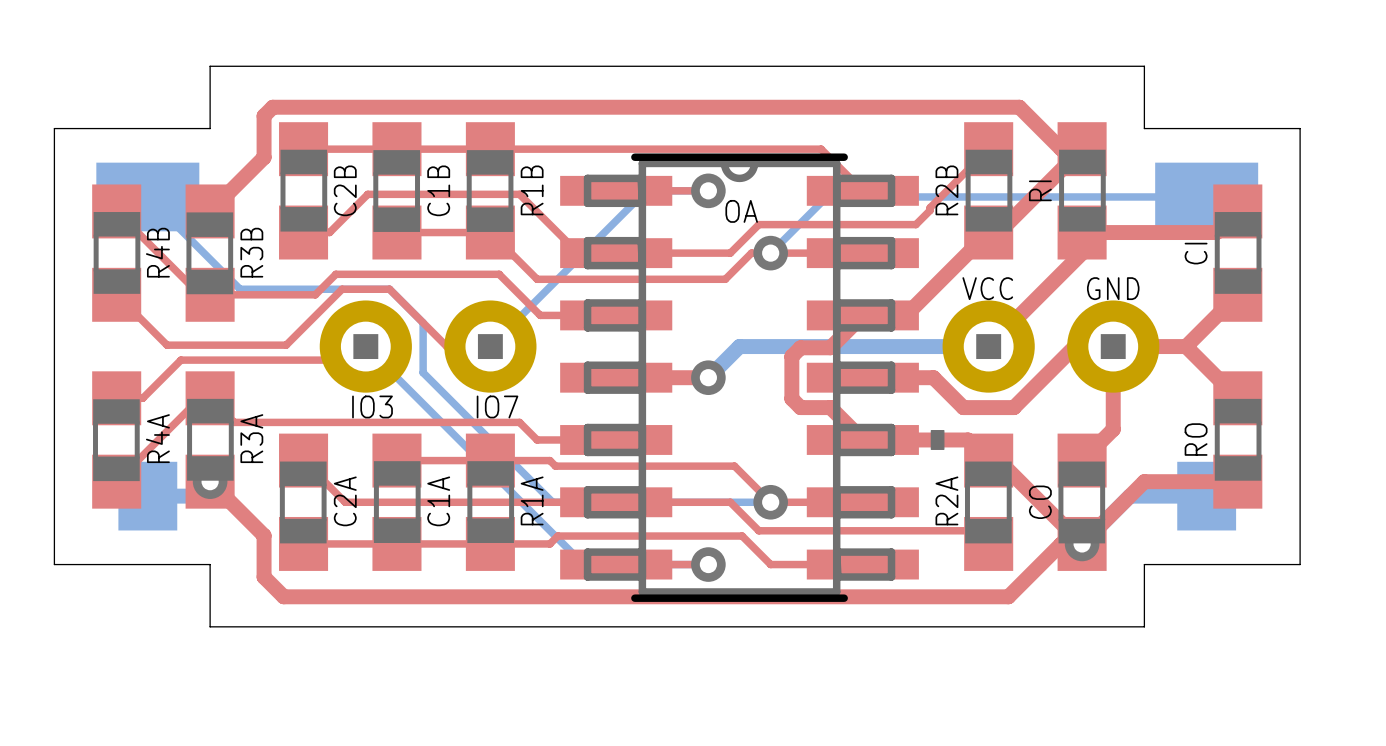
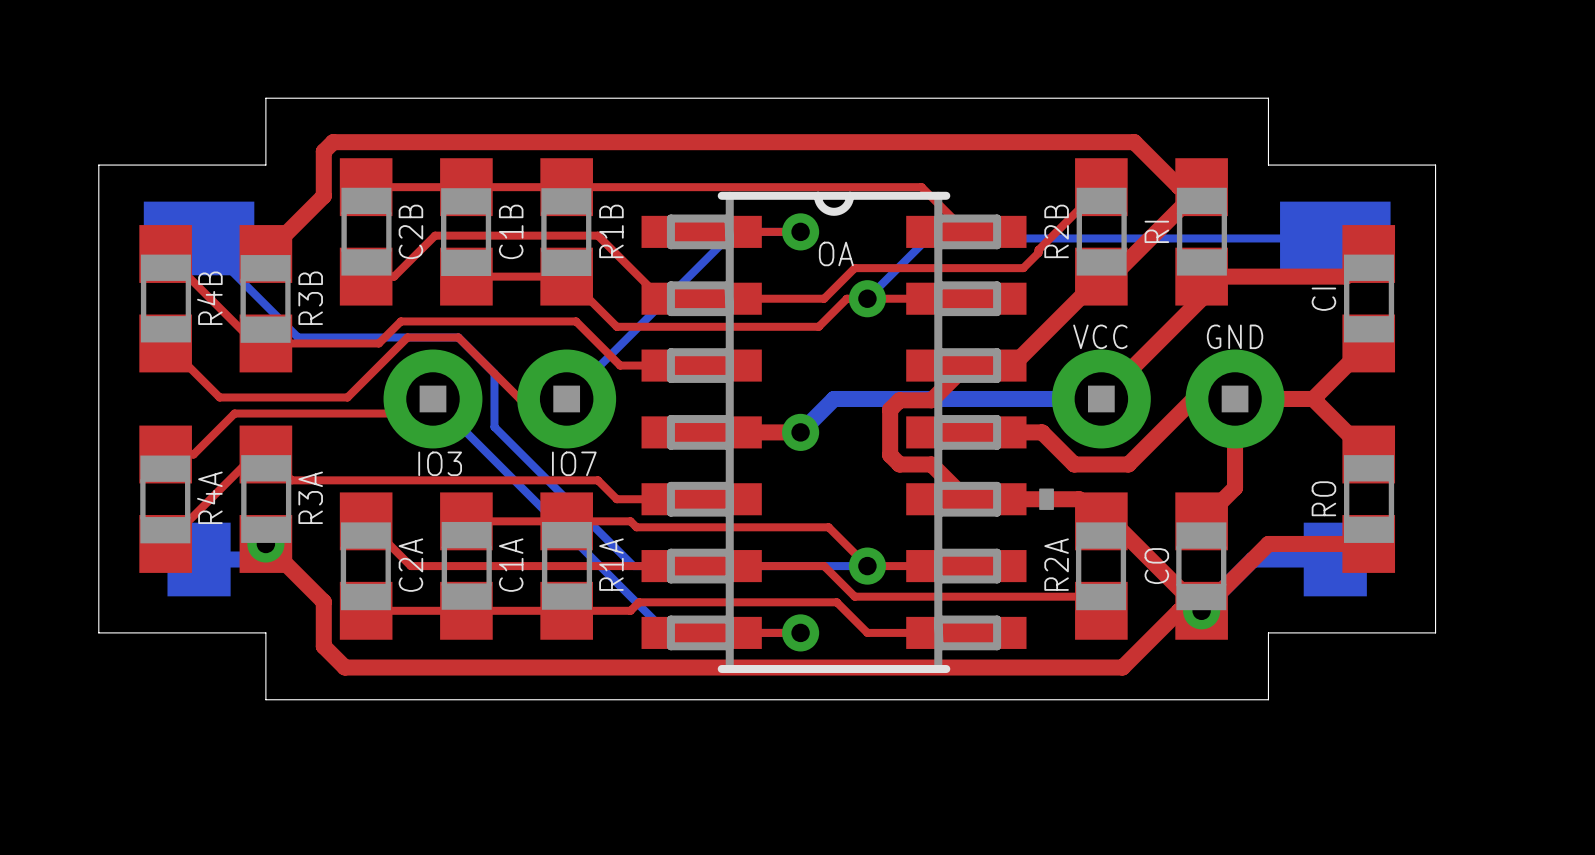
OA footprint: [560, 153, 945, 602] -> [641, 191, 1054, 674]

